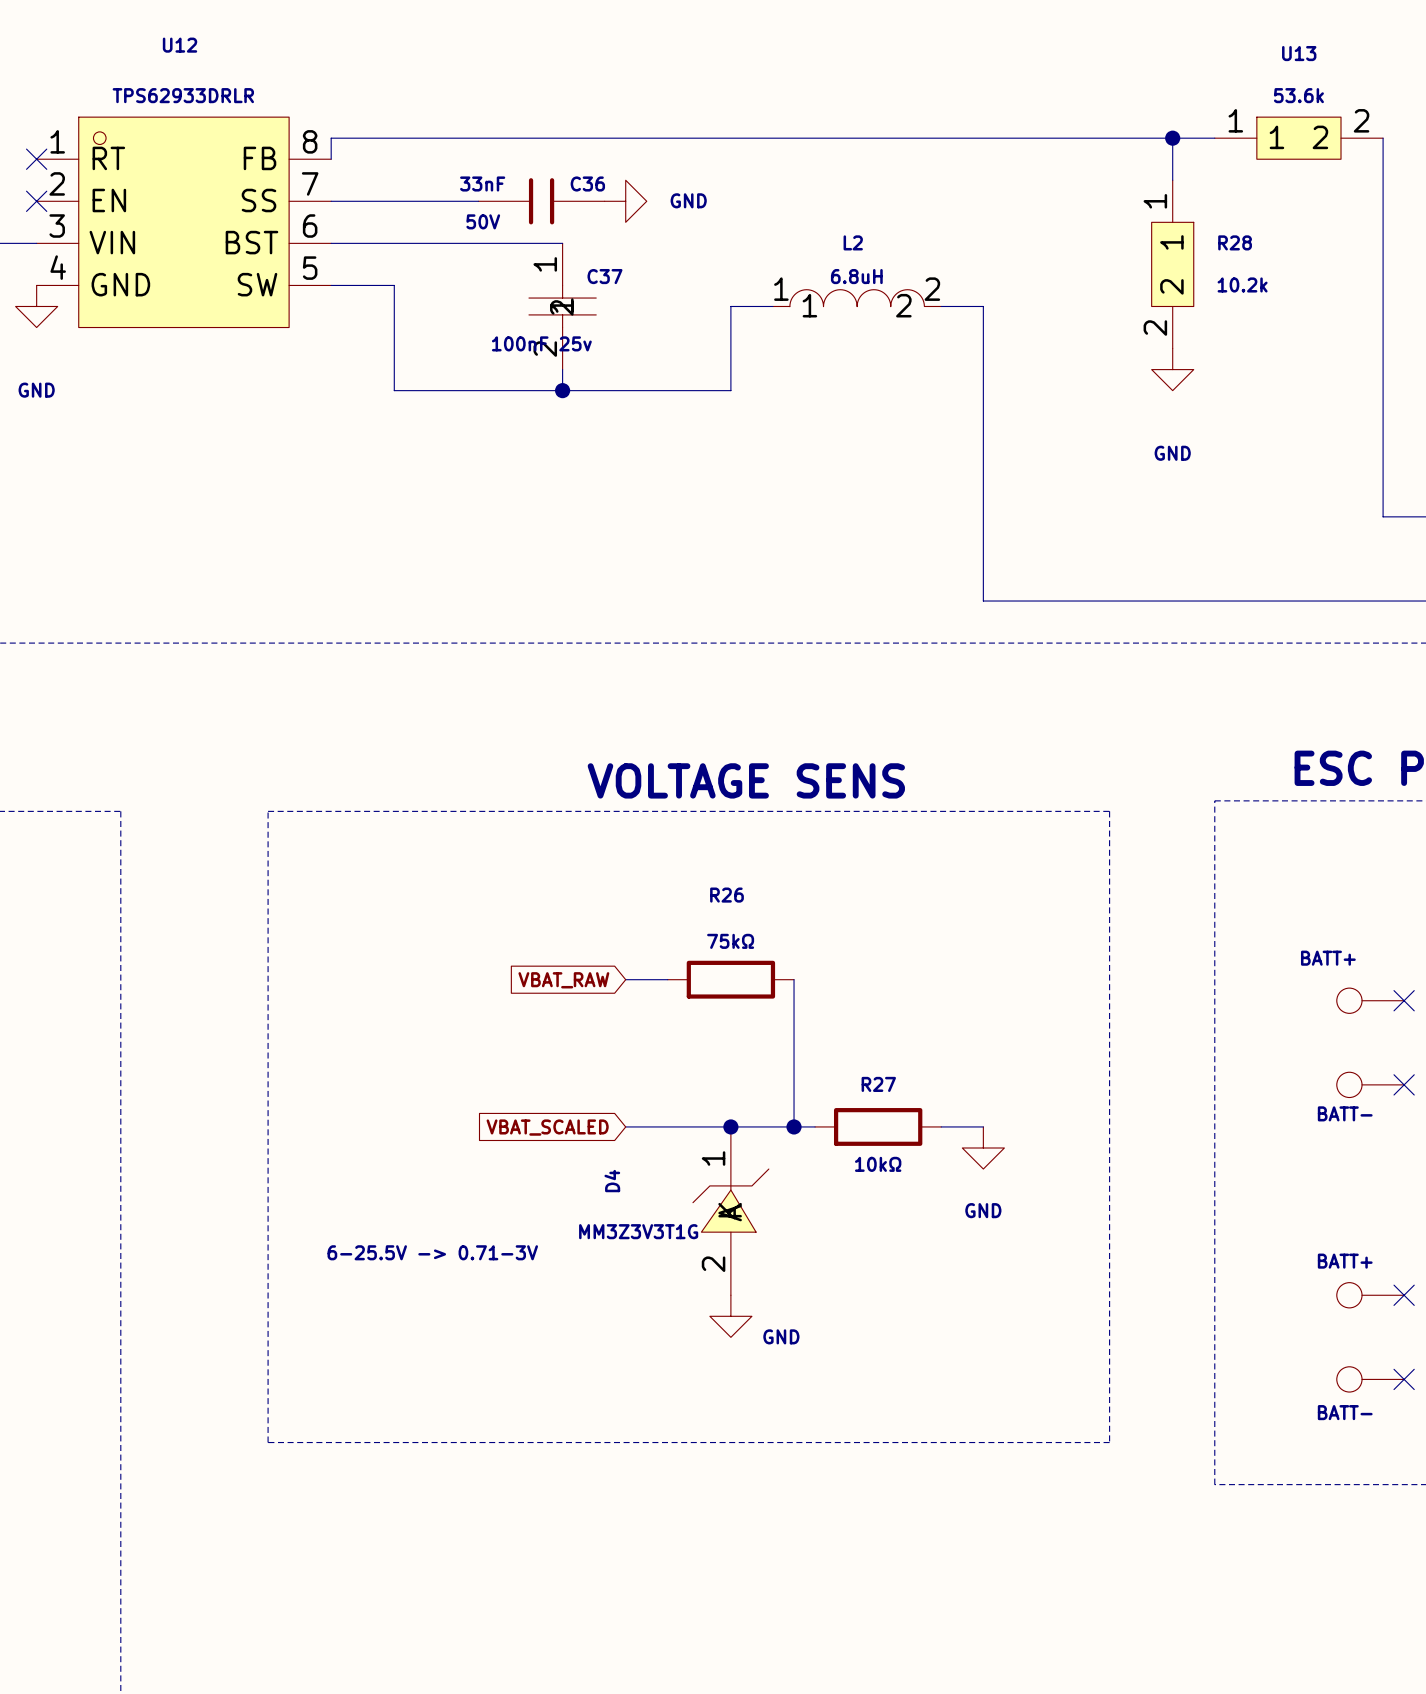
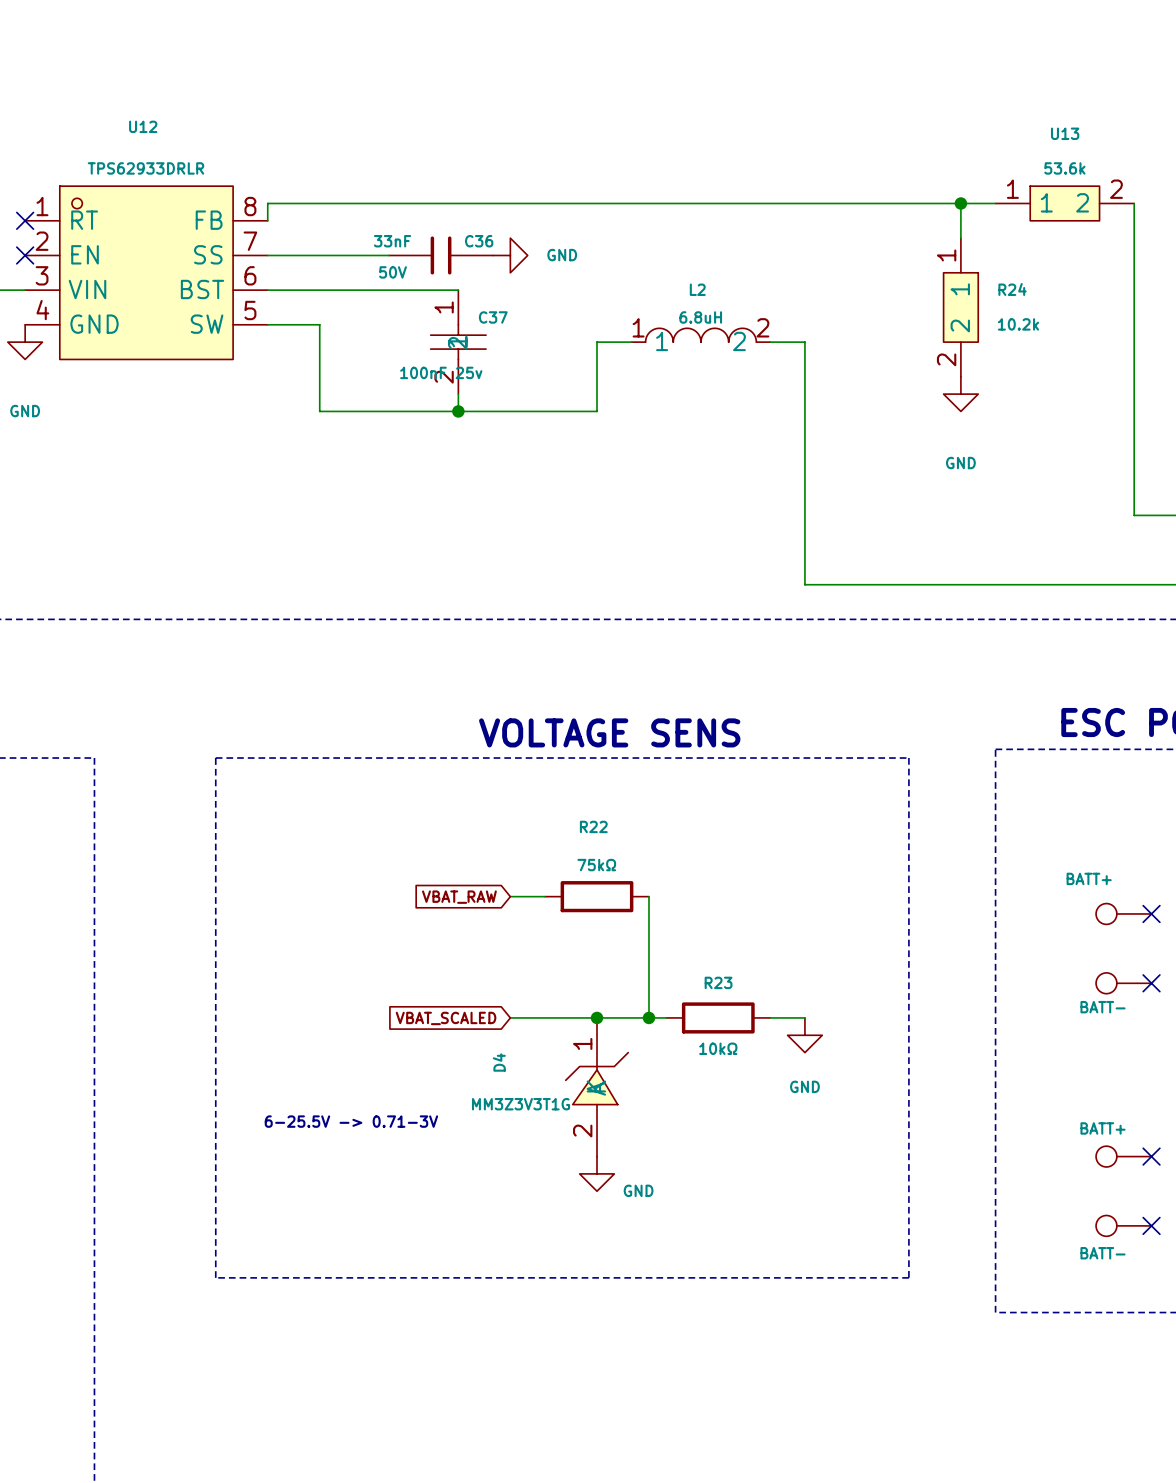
R28 name: R28 (1235, 242) -> R24 (1012, 289)
R26 name: R26 (727, 895) -> R22 (593, 826)
R27 name: R27 (878, 1084) -> R23 (718, 982)

